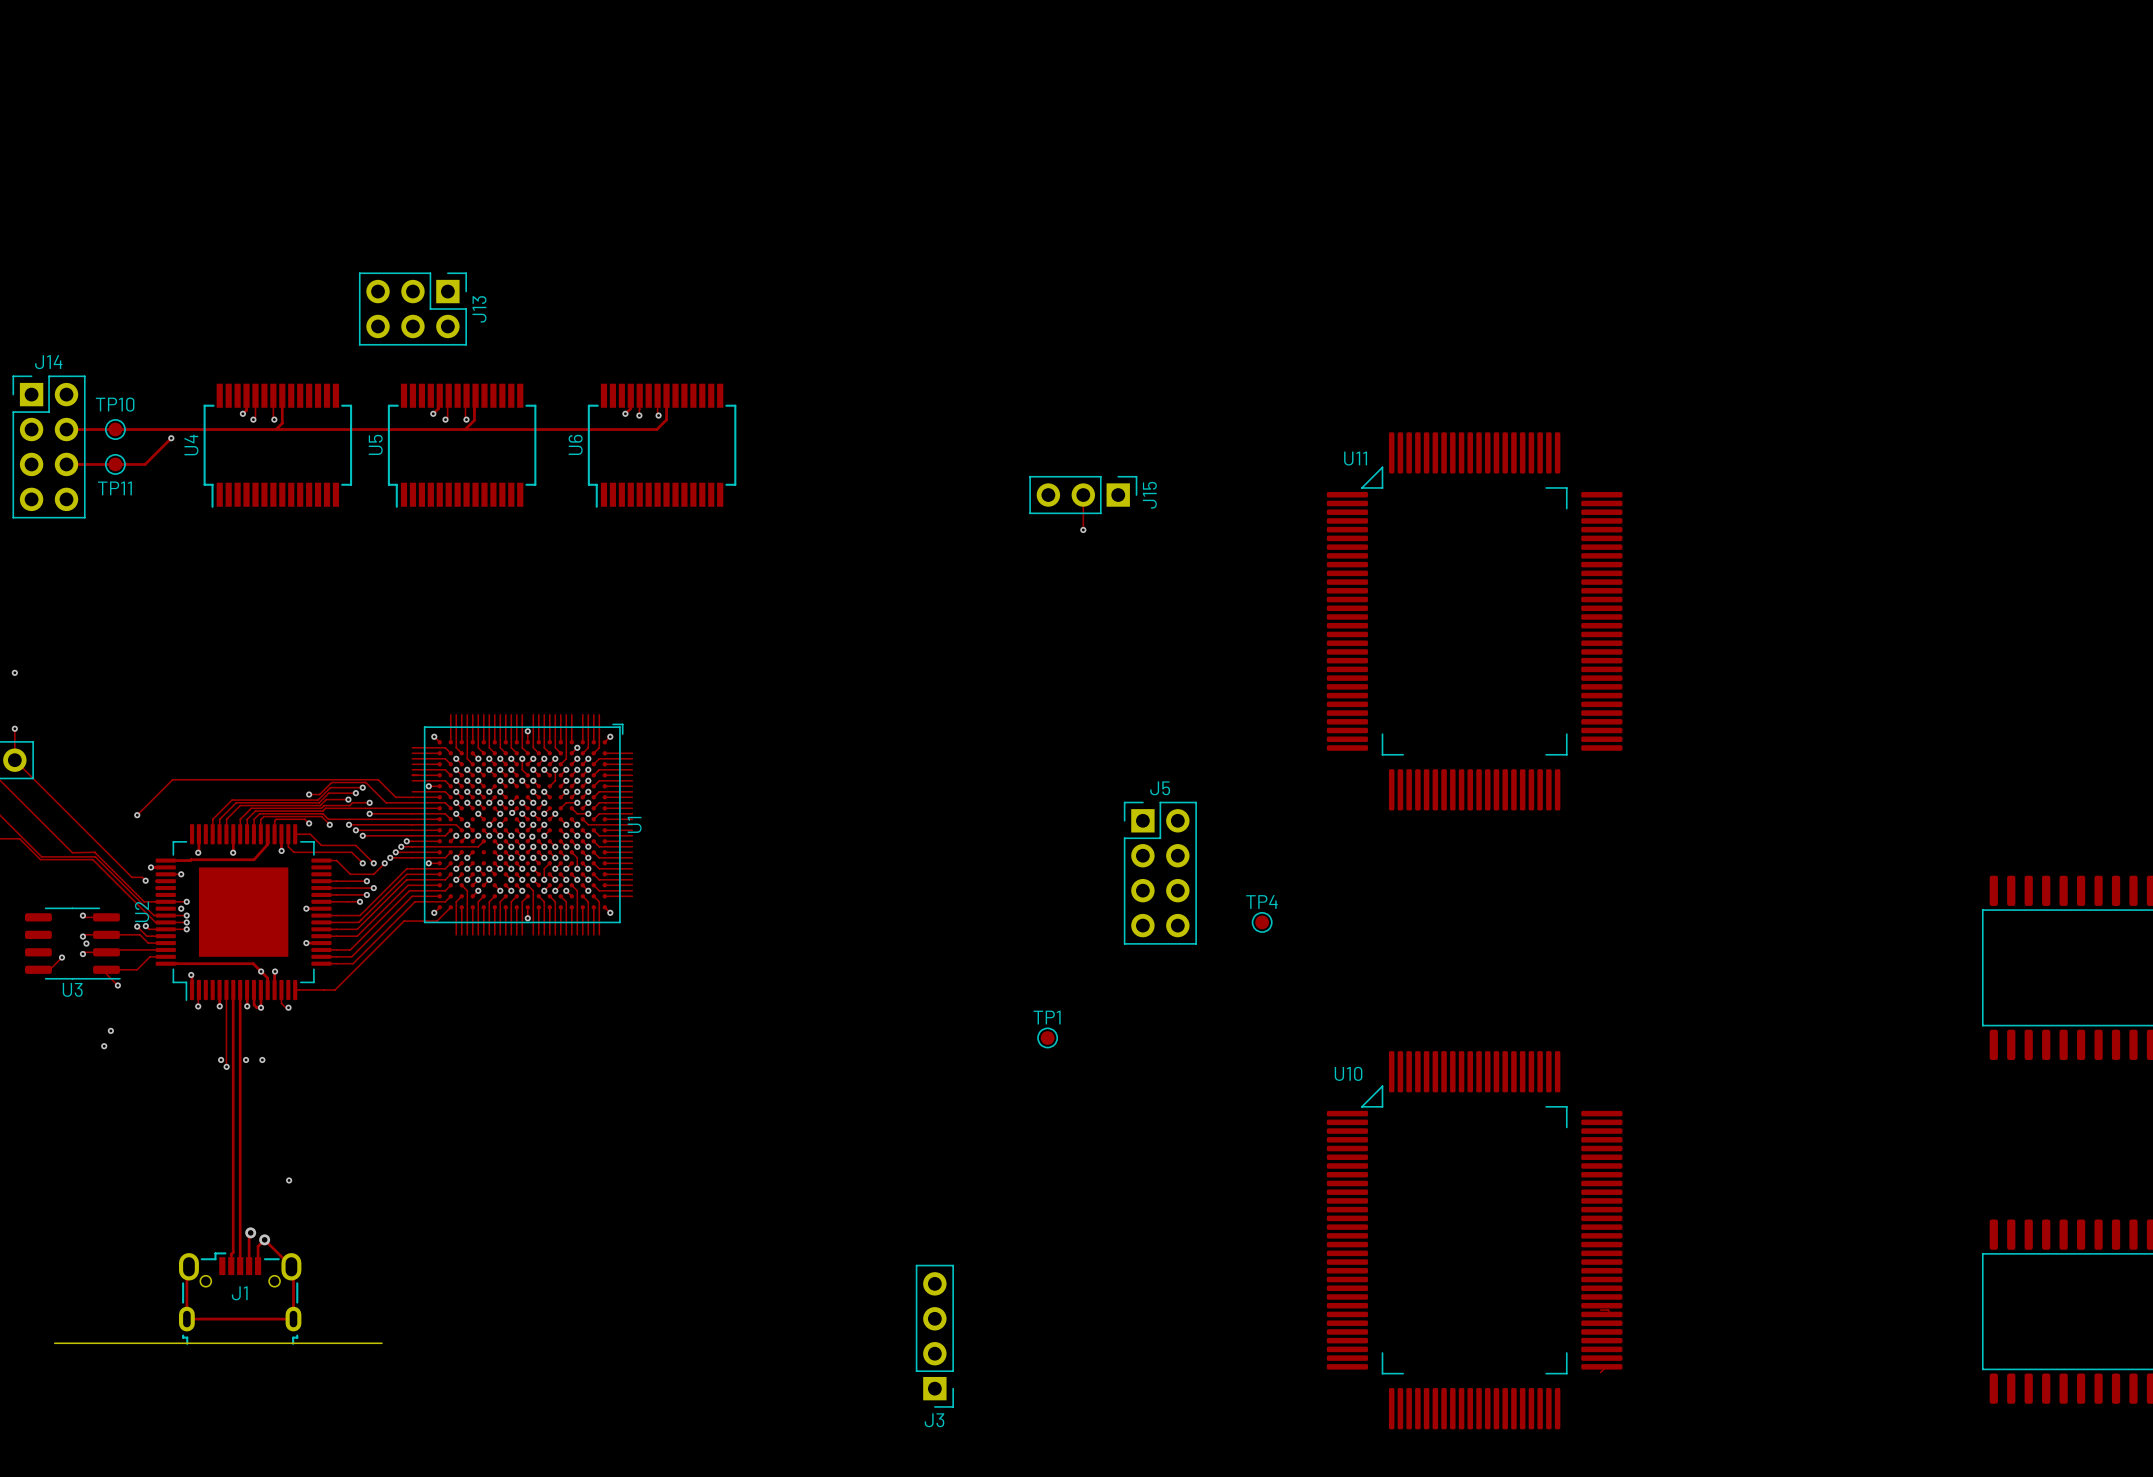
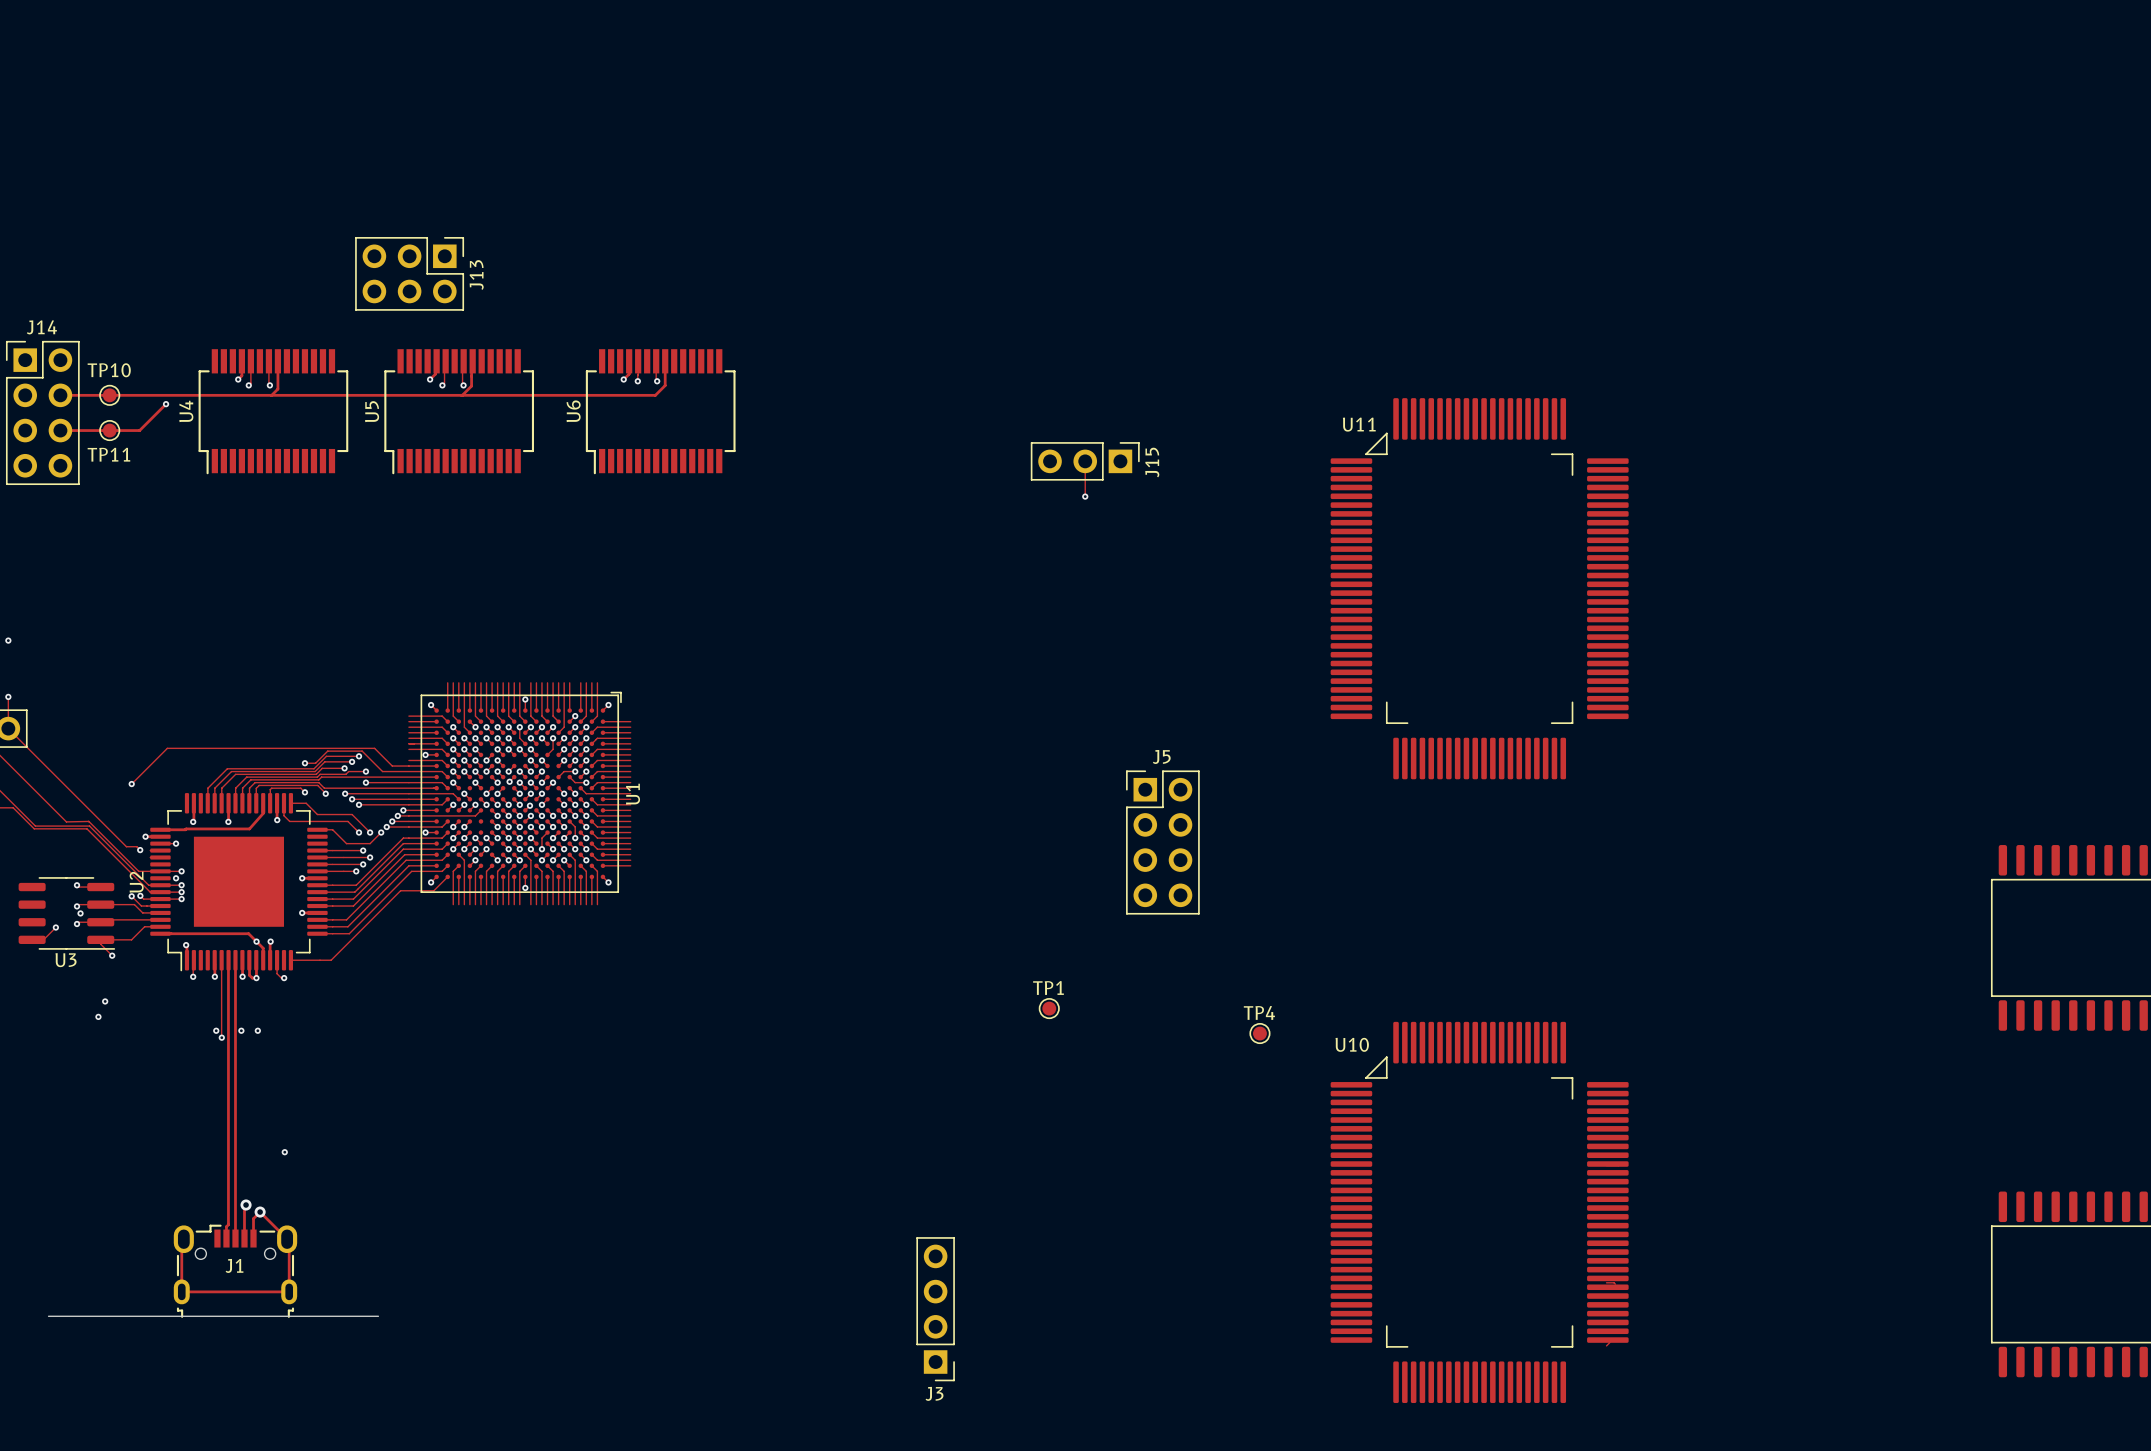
TP4 position: (1262, 922) -> (1259, 1033)

